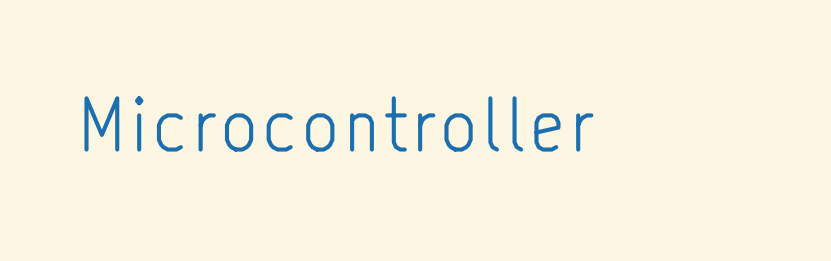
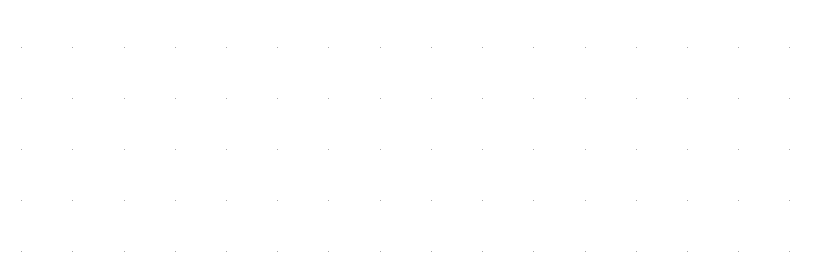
text: Microcontroller (338, 123) -> none

